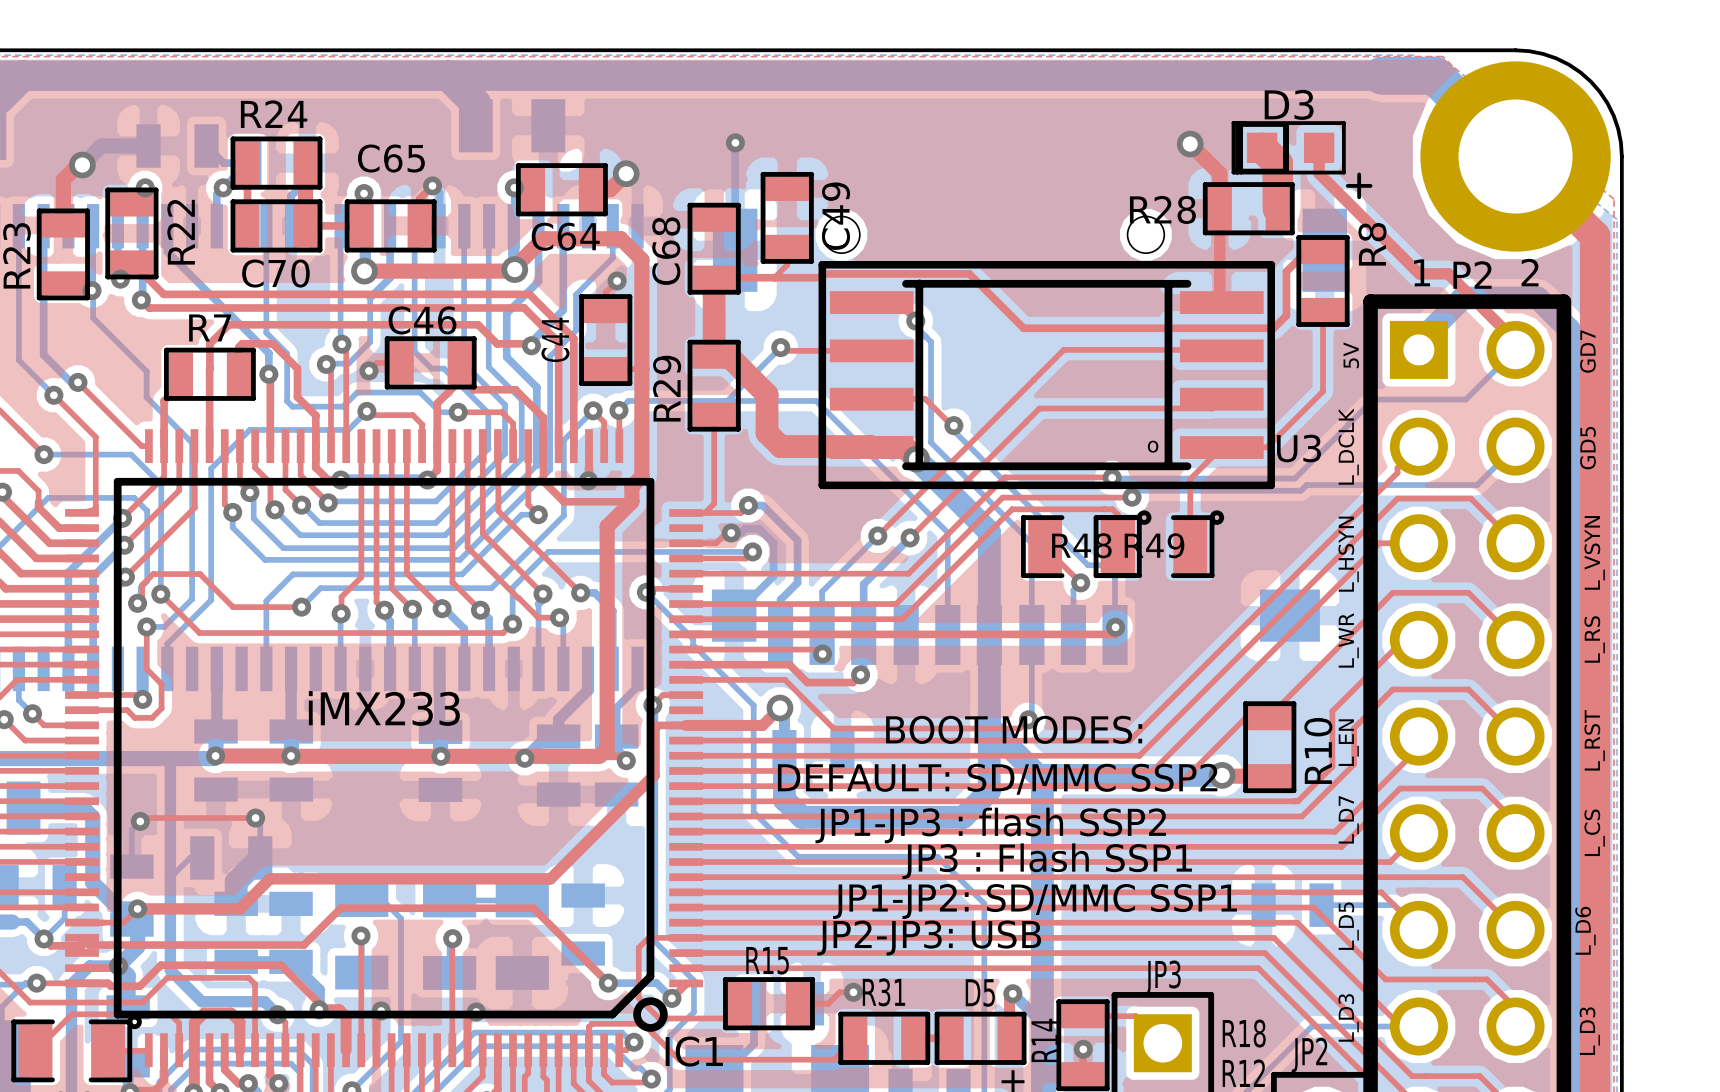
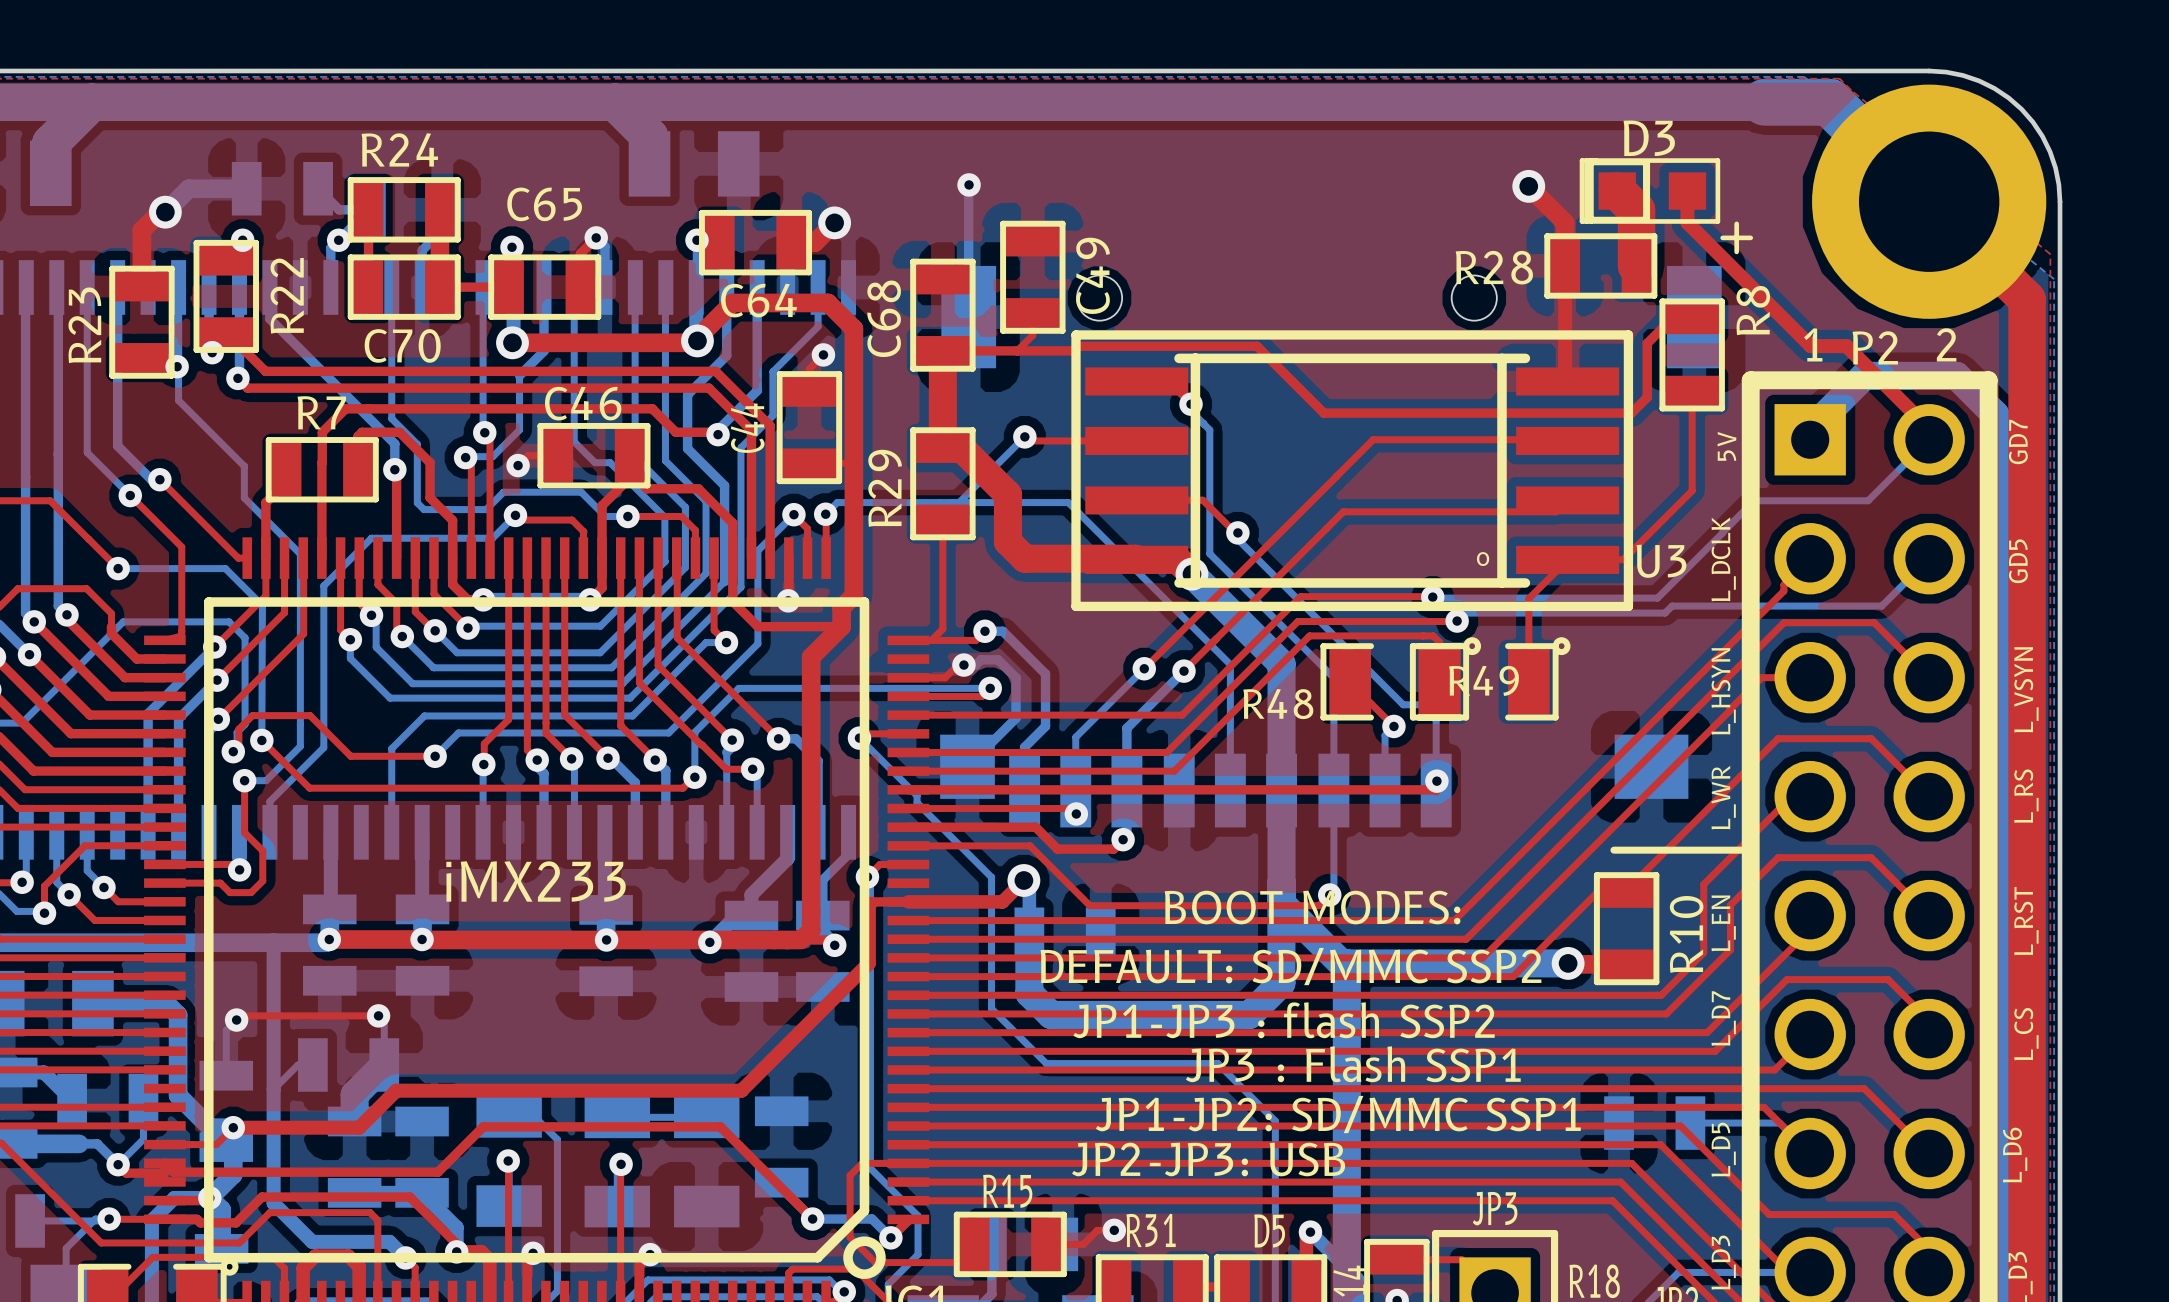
R48 name position: R48 (1081, 545) -> R48 (1278, 704)
line: none -> (1613, 850) (1750, 850)

